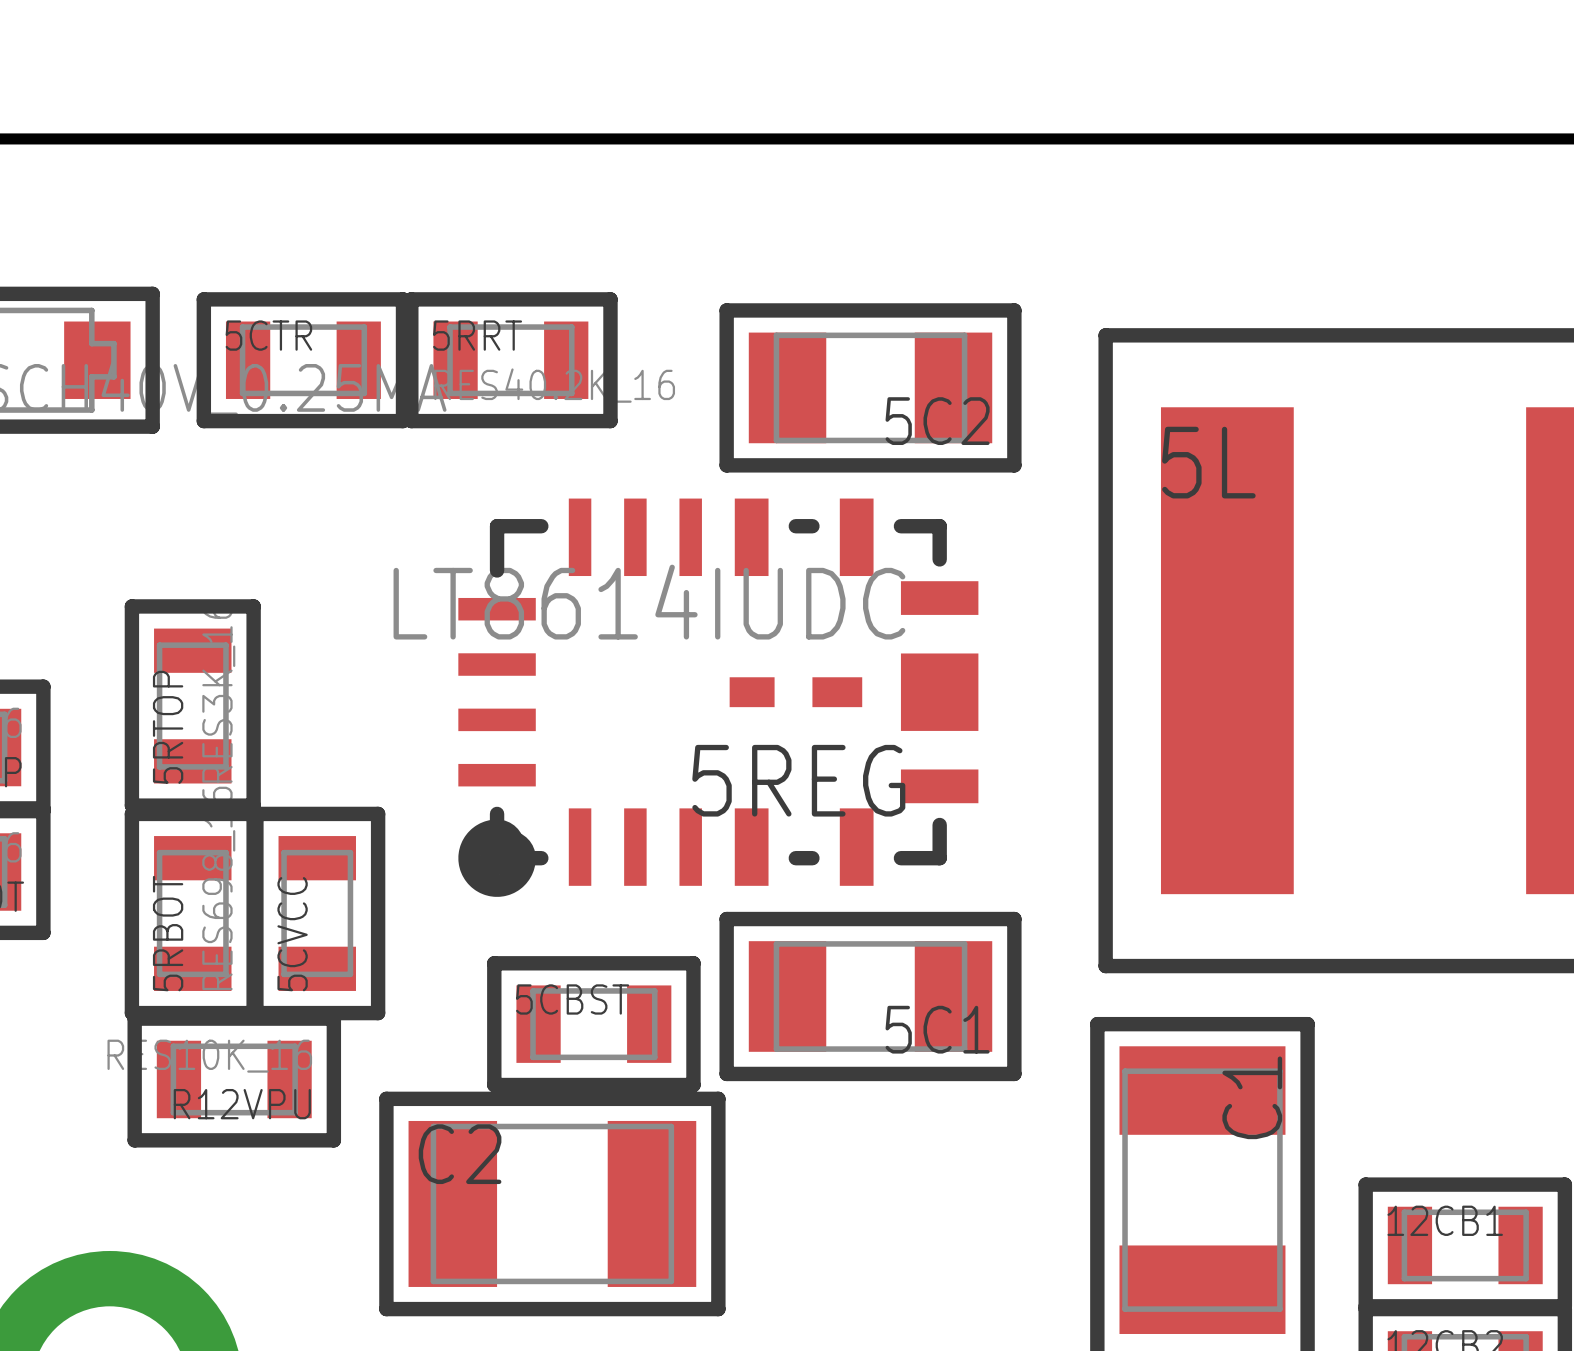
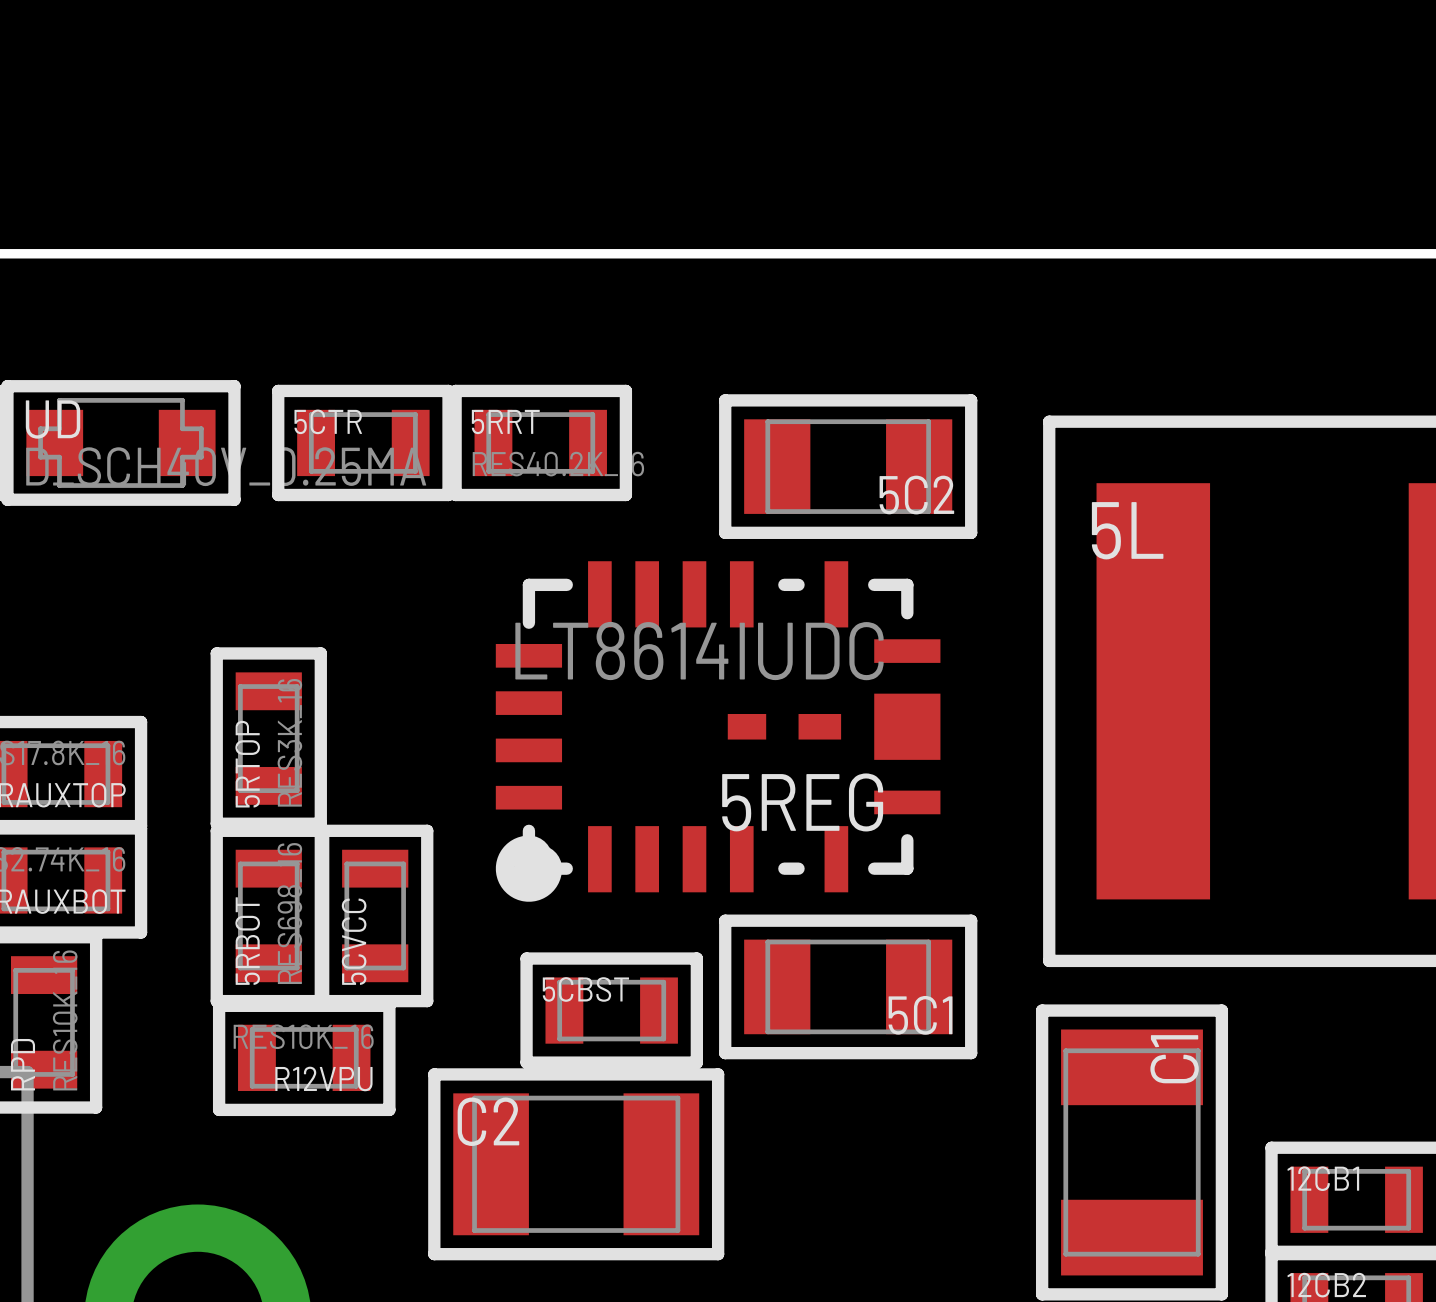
5REG footprint: [458, 498, 979, 897] -> [495, 561, 941, 902]

